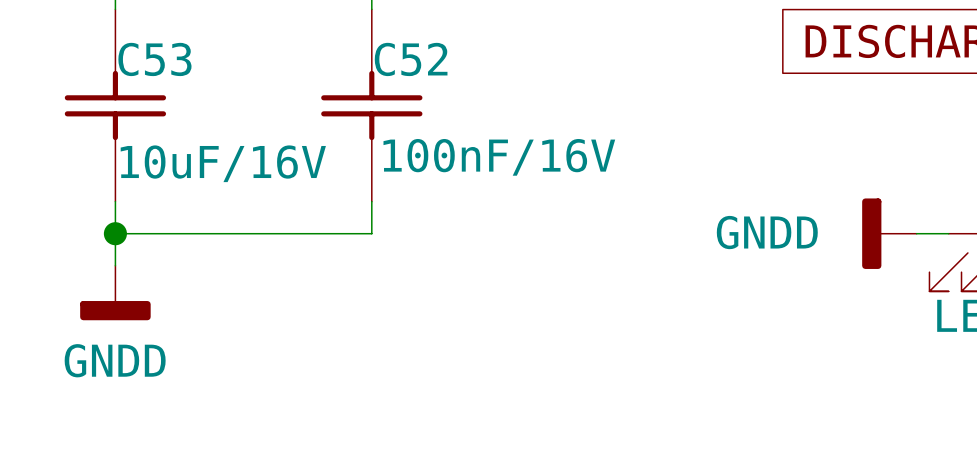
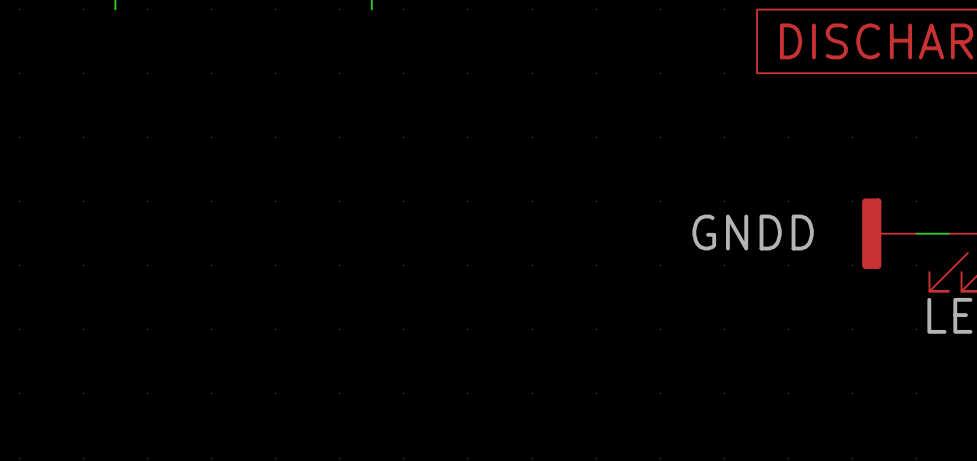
C53: 10uF/16V (115, 105) -> none
C52: 100nF/16V (371, 105) -> none
wire: (115, 201) (115, 265) -> none
wire: (371, 201) (371, 233) (115, 233) -> none
junction: (115, 233) -> none
power symbol: GNDD (115, 293) -> none

